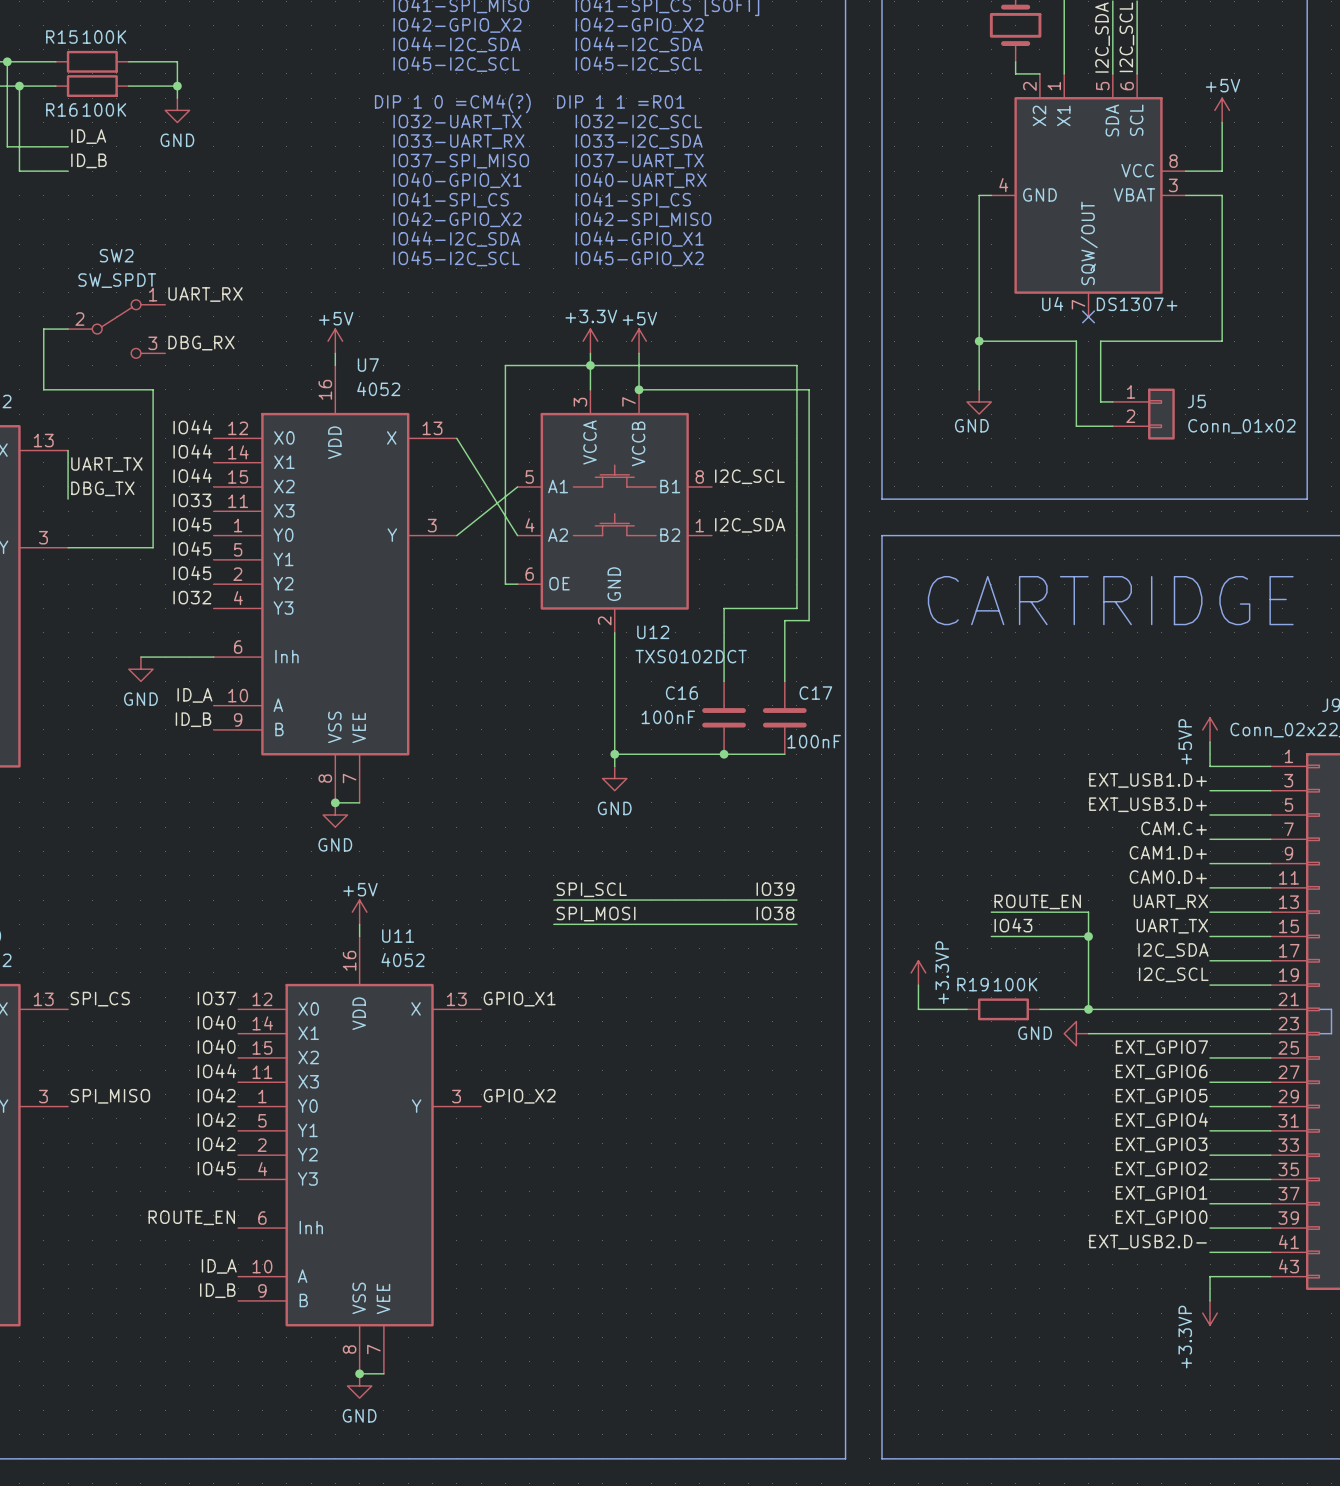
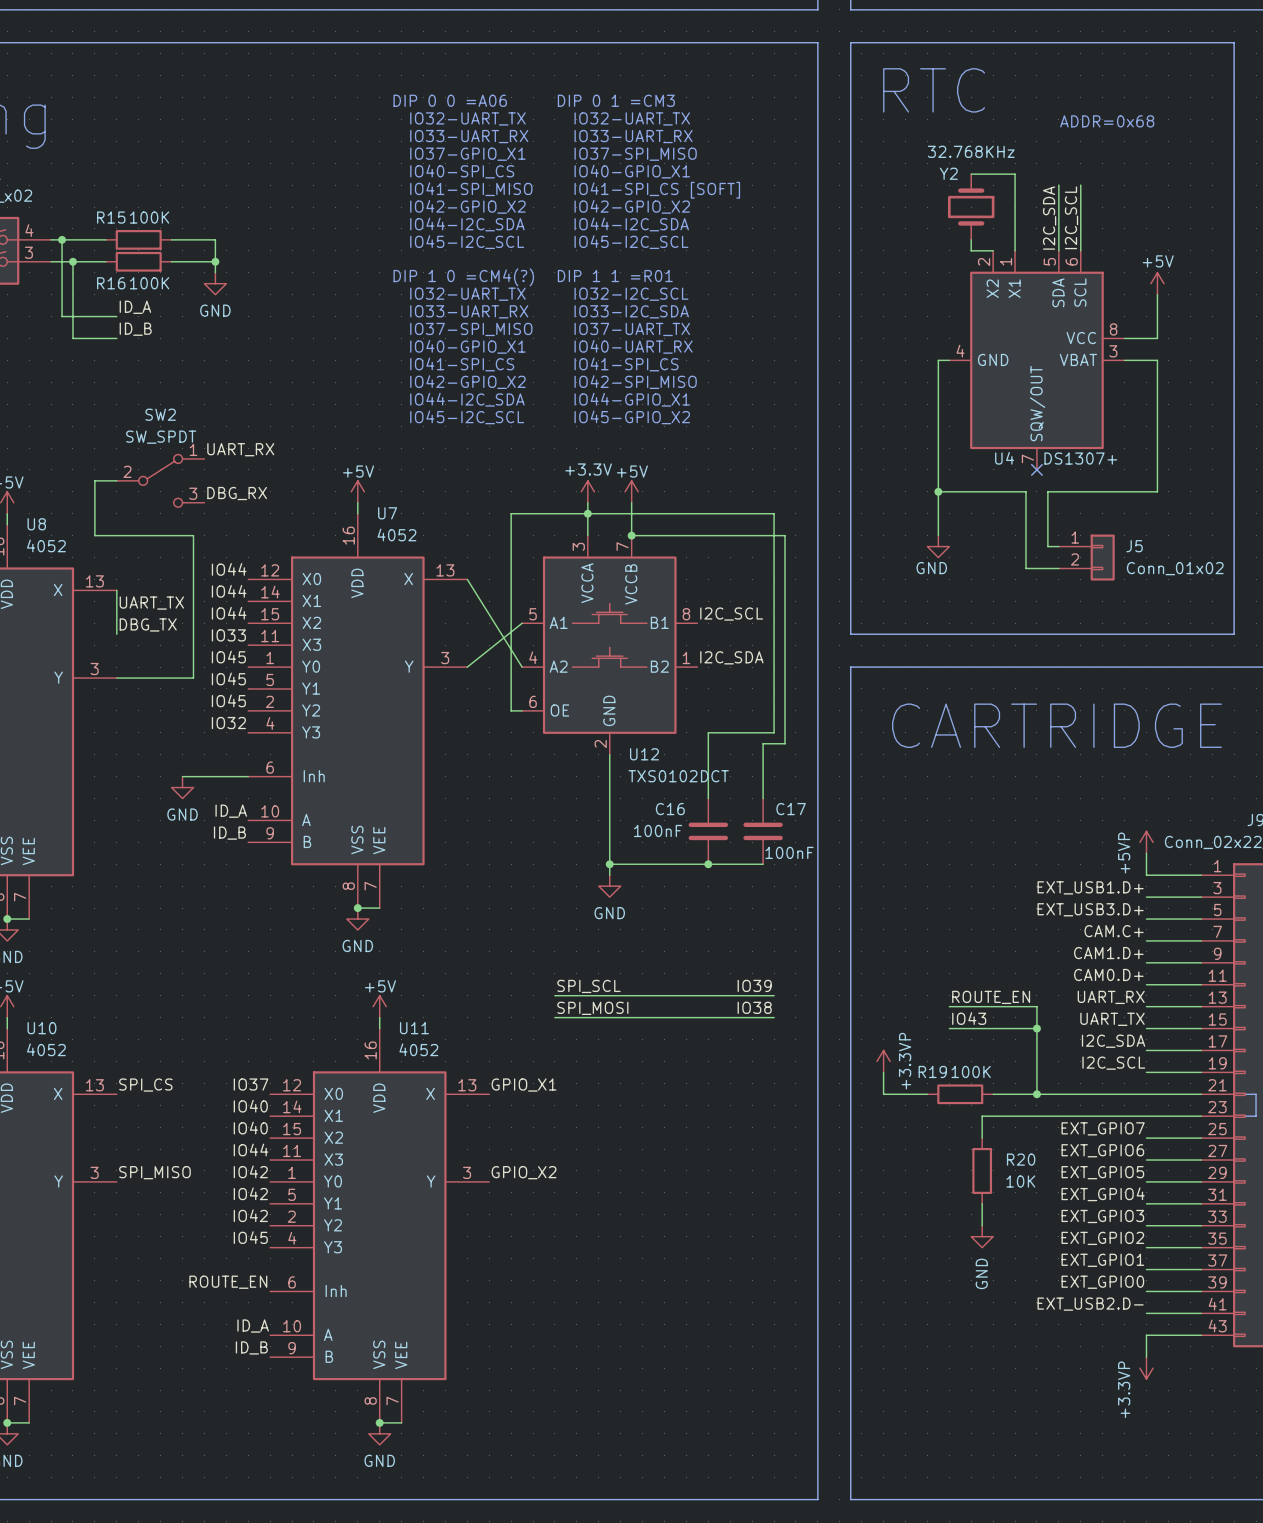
power symbol rotation: 0° (1076, 1033) -> 90° counterclockwise (982, 1236)
power symbol position: GND (1076, 1033) -> GND (982, 1236)
wire: none -> (1036, 1116) (982, 1116) (982, 1138)
R20: none -> 10K (982, 1170)
wire: none -> (982, 1203) (982, 1225)

